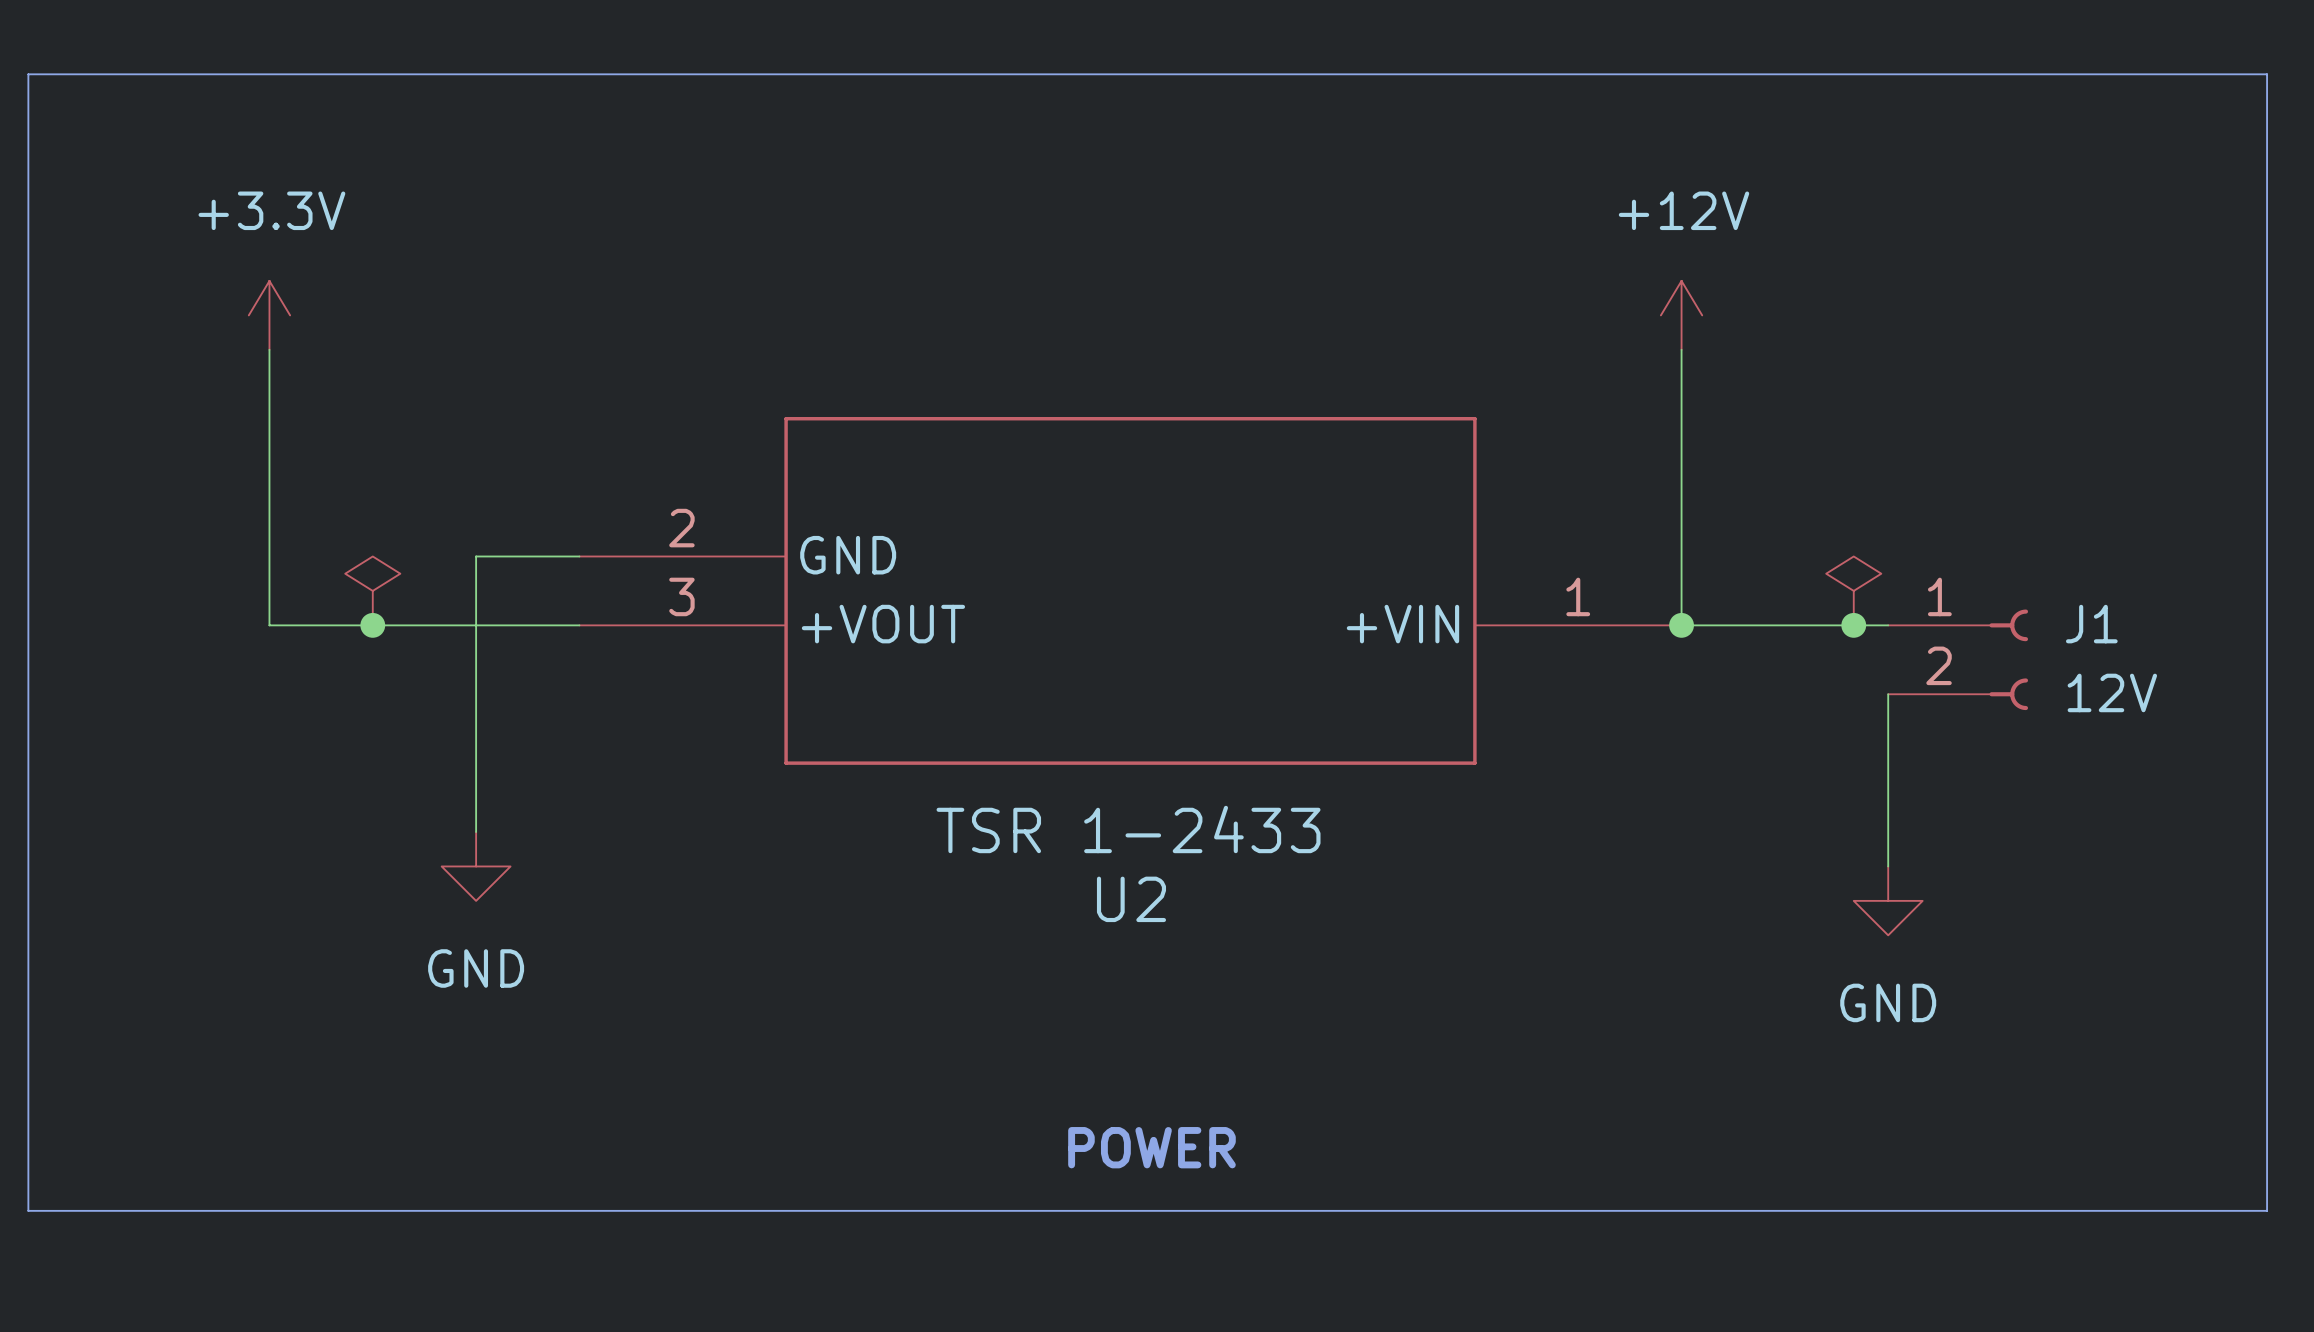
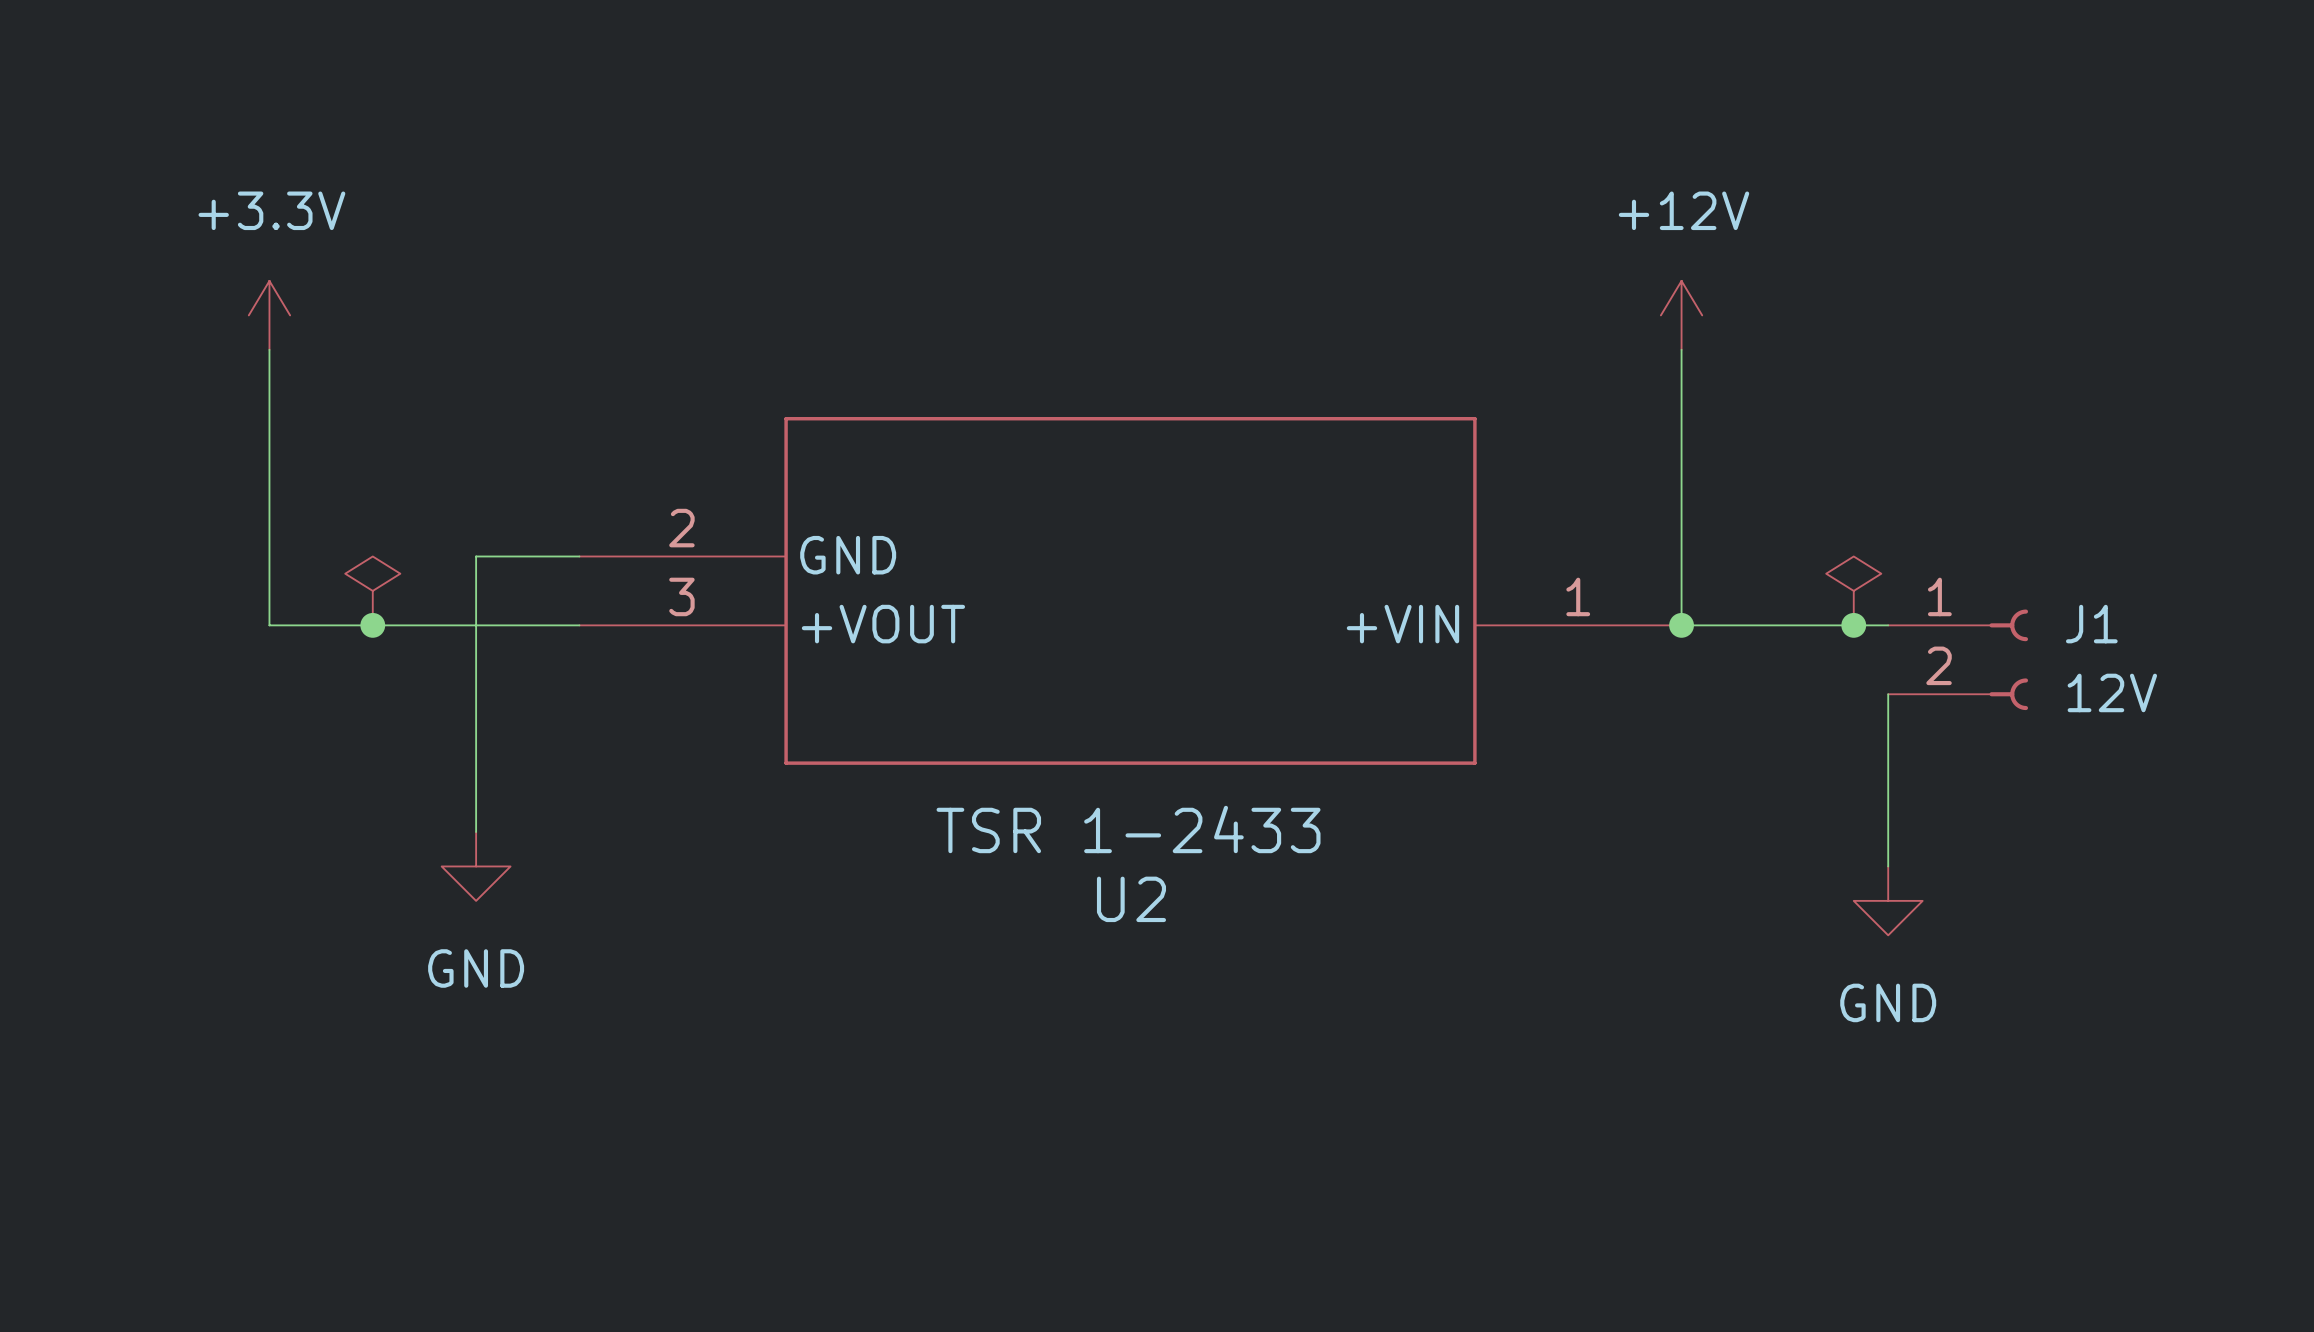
line: (28, 74) (2267, 74) (2267, 1210) (28, 1210) (28, 74) -> none
text: POWER (1151, 1147) -> none

